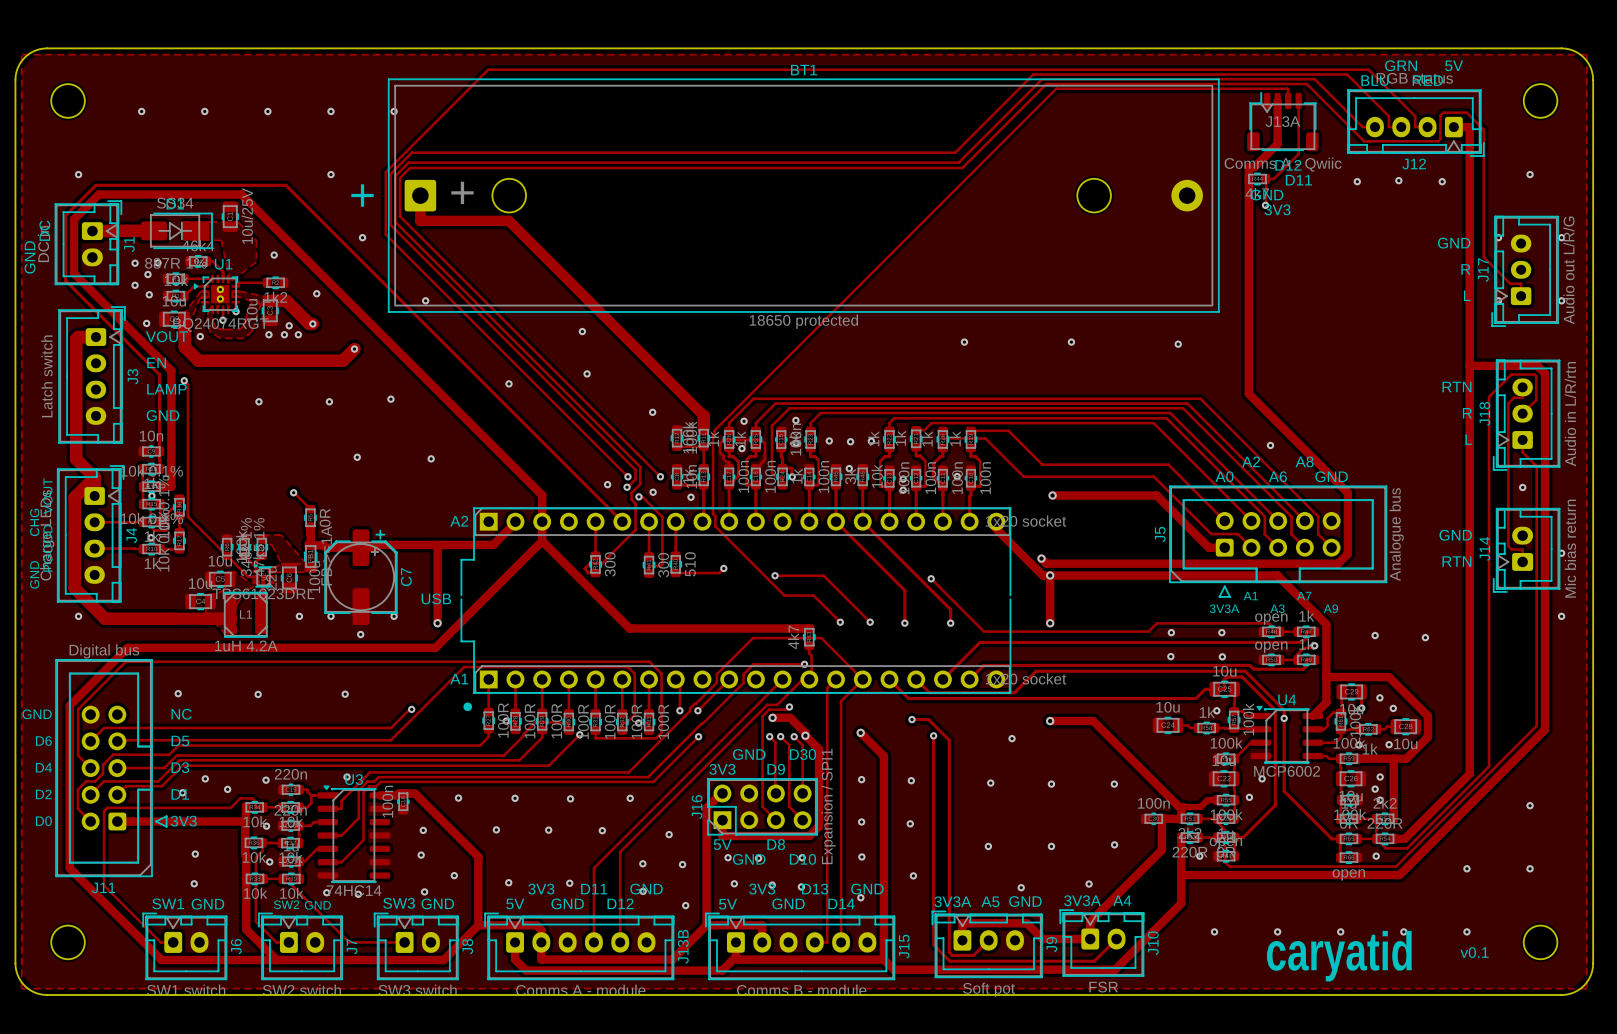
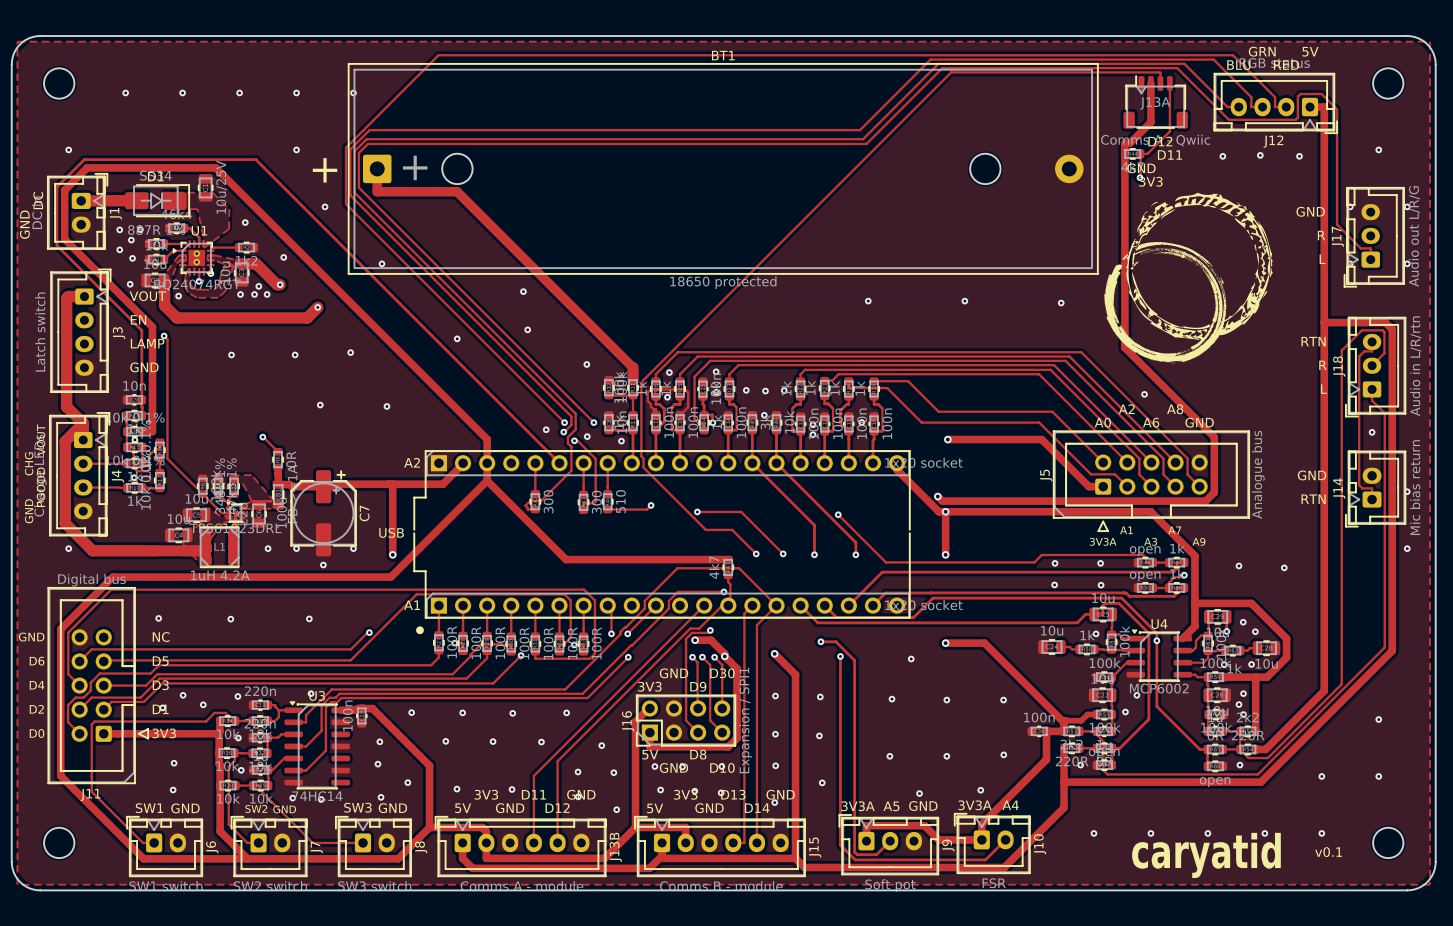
drawing: none -> [1104, 192, 1274, 364]

